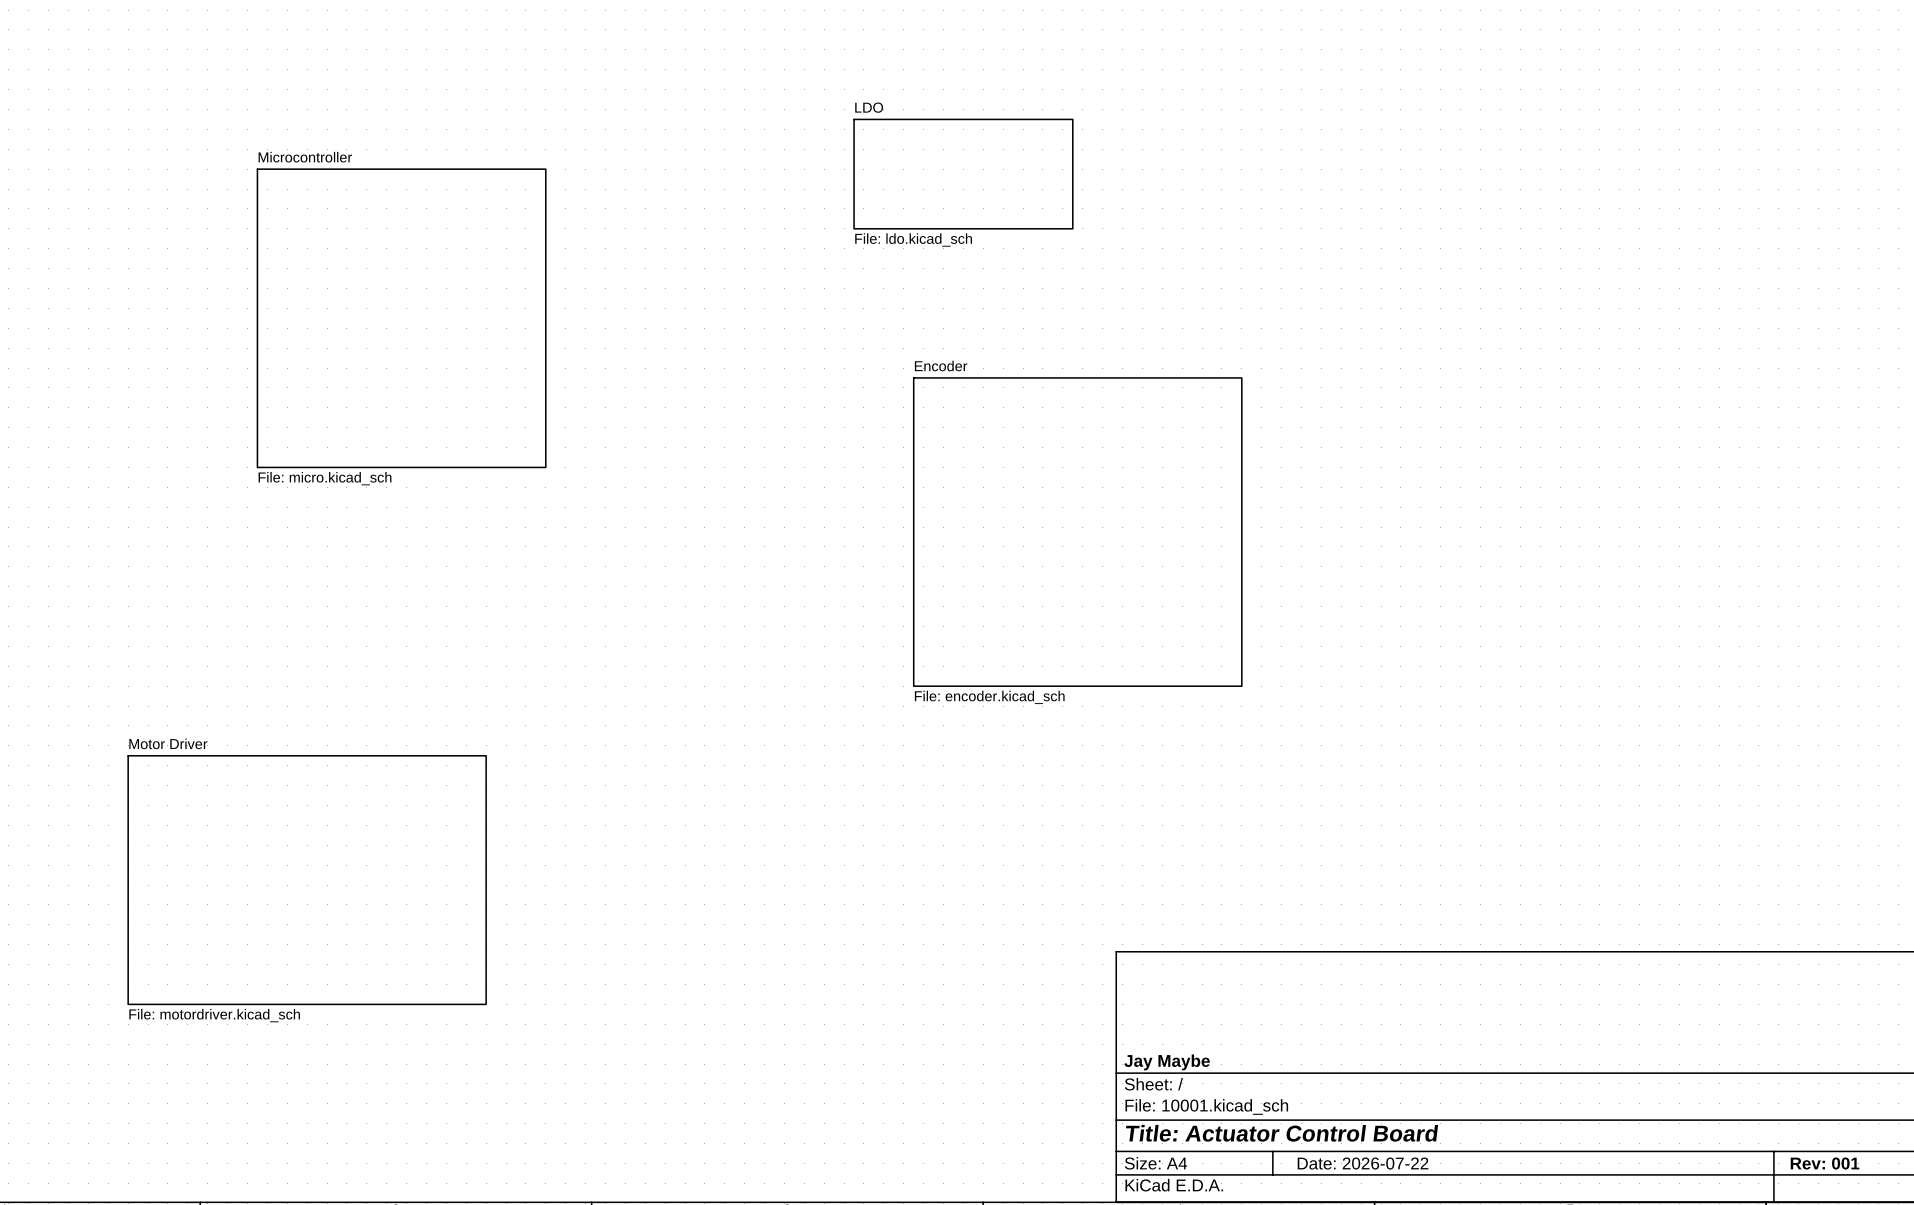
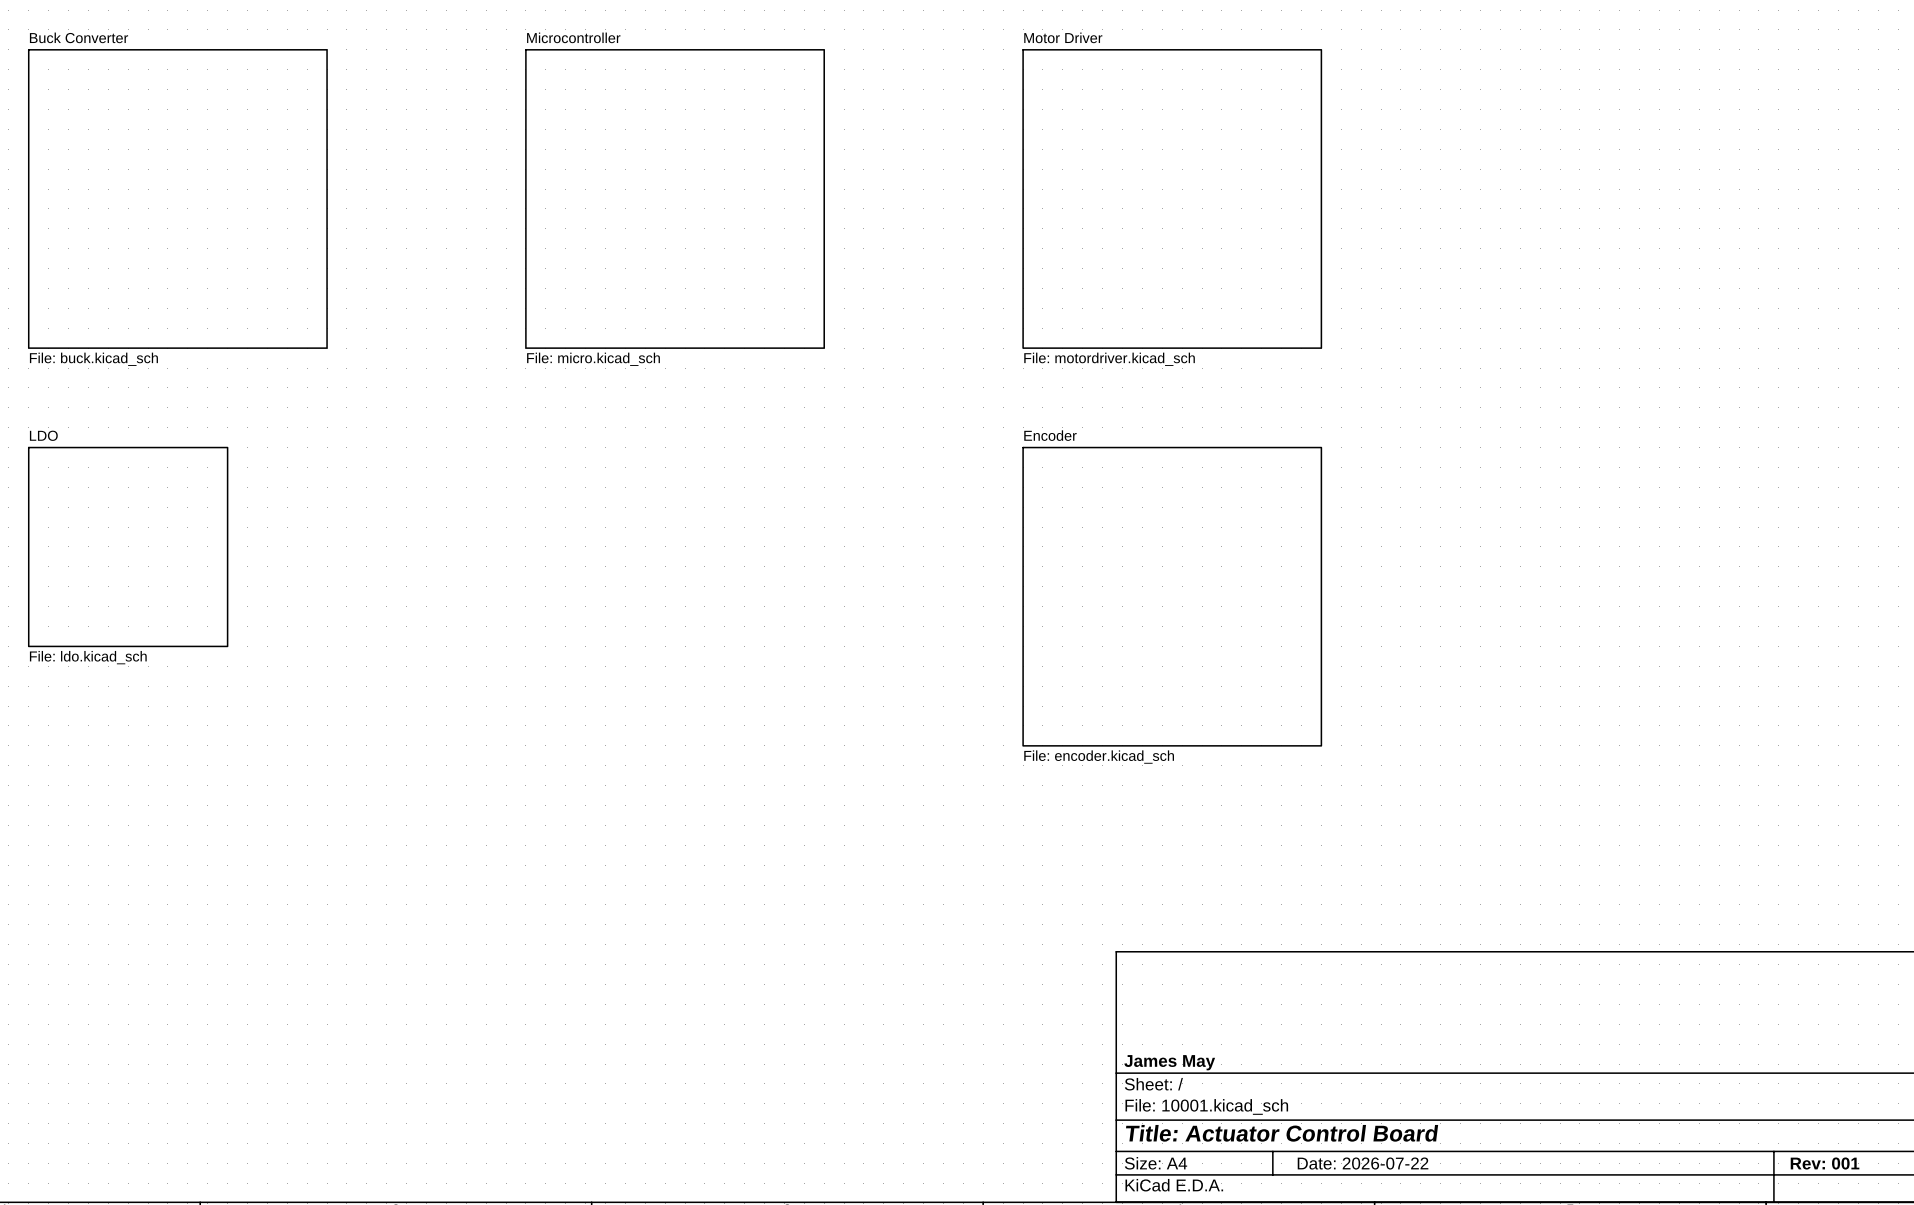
sheet LDO: File: ldo.kicad_sch (963, 174) -> none
sheet Buck Converter: none -> File: buck.kicad_sch (177, 198)
sheet Microcontroller: none -> File: micro.kicad_sch (675, 198)
sheet Motor Driver: none -> File: motordriver.kicad_sch (1172, 198)
sheet Microcontroller: File: micro.kicad_sch (401, 318) -> none
sheet Encoder: File: encoder.kicad_sch (1077, 532) -> none
sheet LDO: none -> File: ldo.kicad_sch (128, 546)
sheet Encoder: none -> File: encoder.kicad_sch (1172, 596)
sheet Motor Driver: File: motordriver.kicad_sch (307, 880) -> none
title block: Jay Maybe (1167, 1062) -> James May (1169, 1062)

